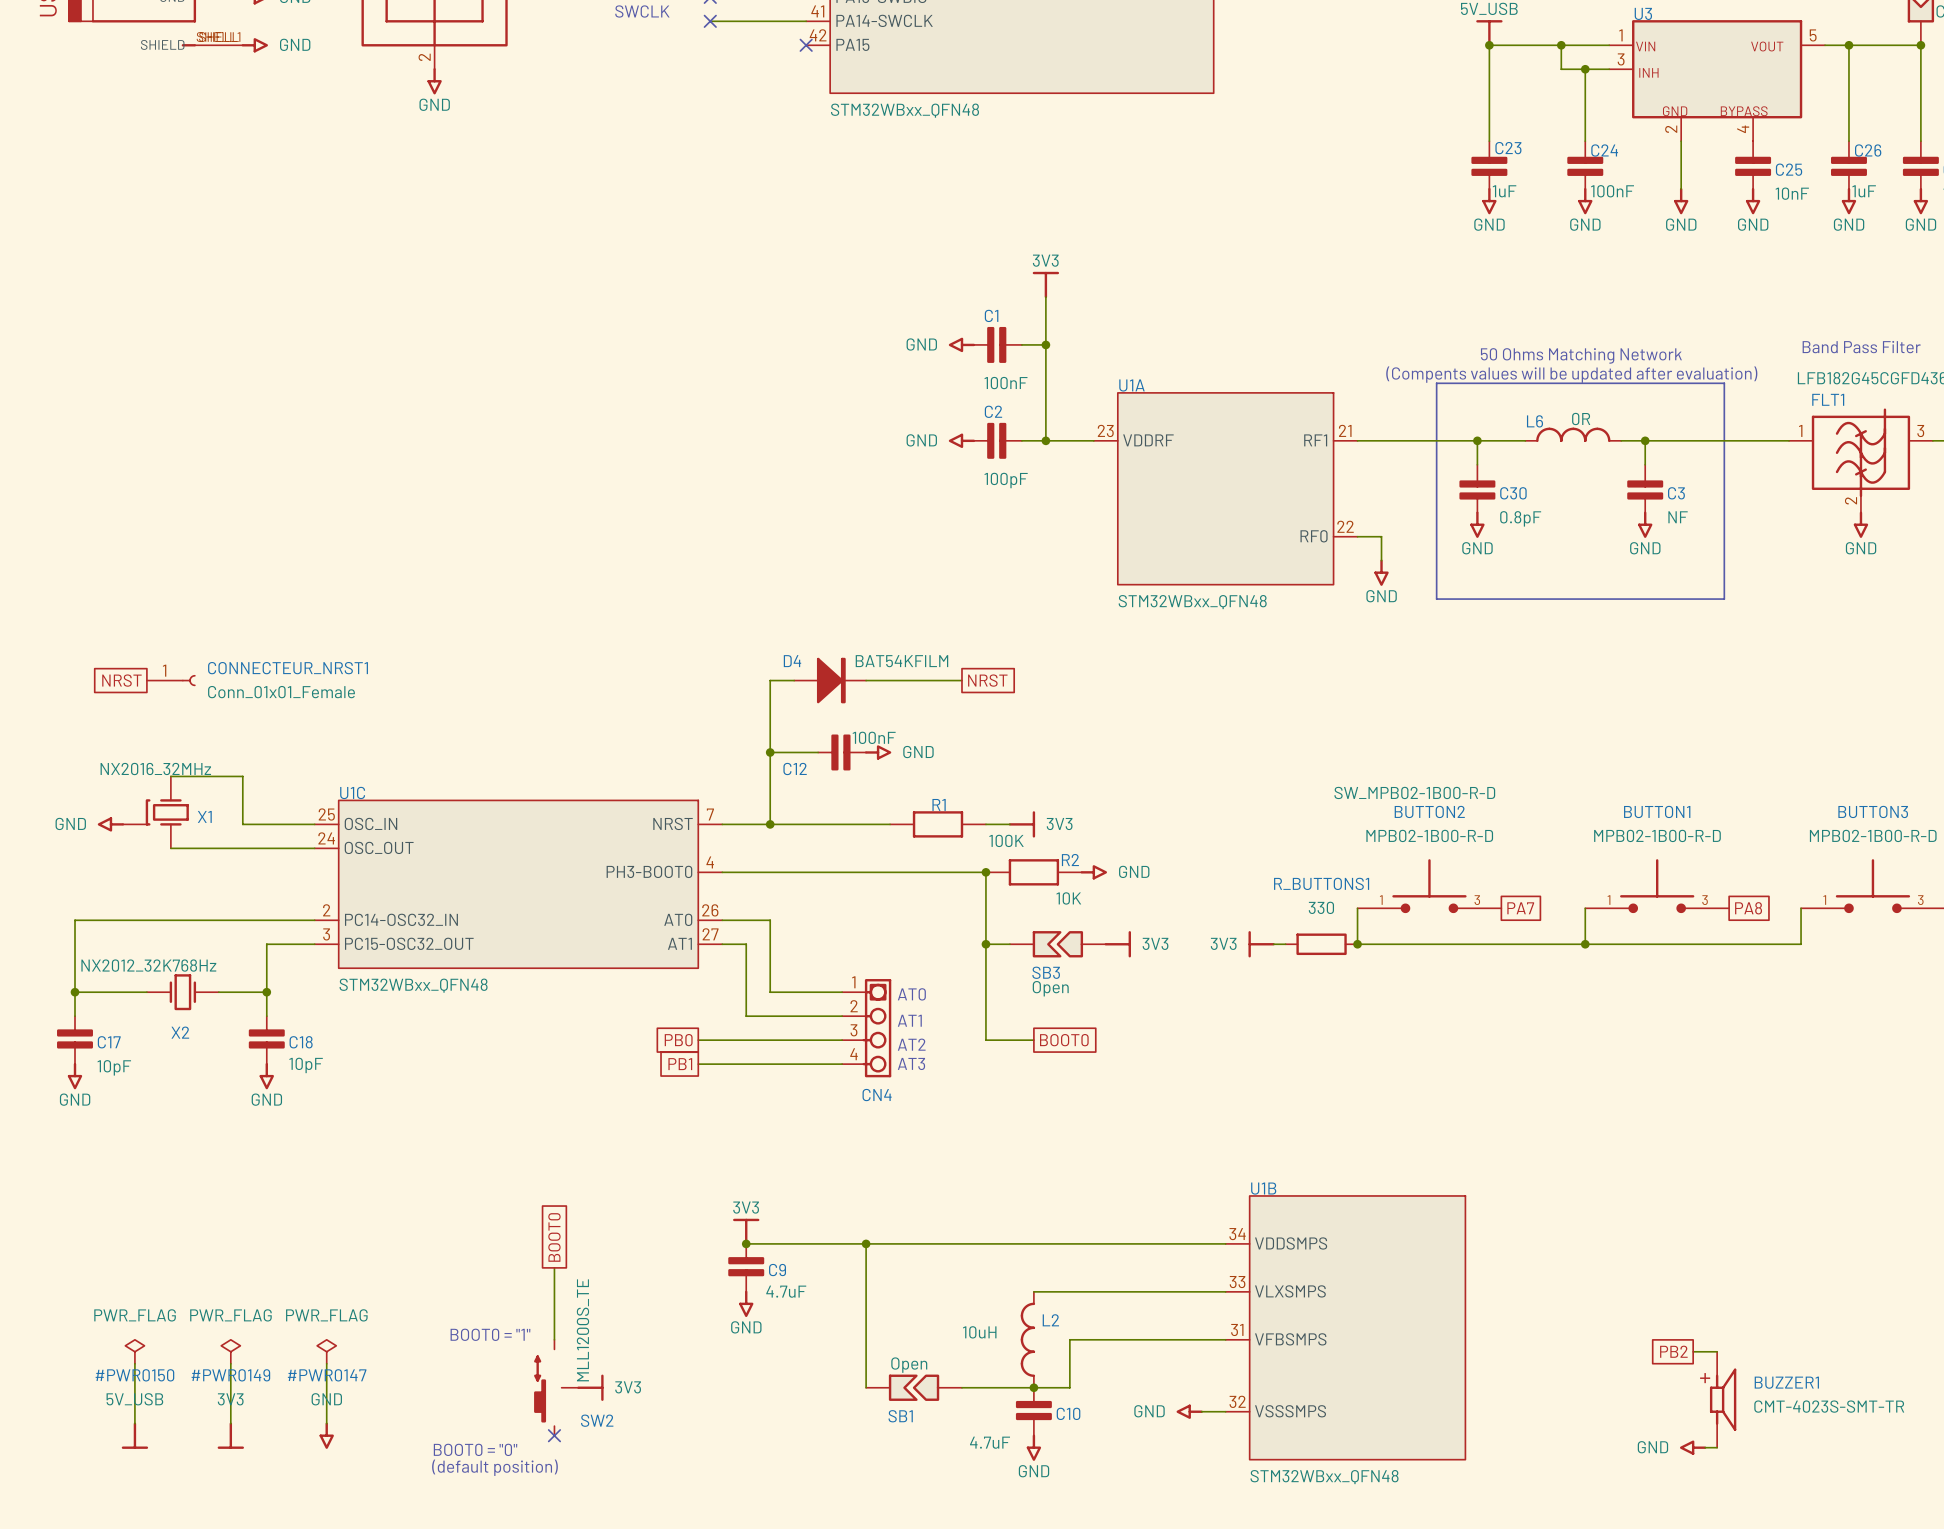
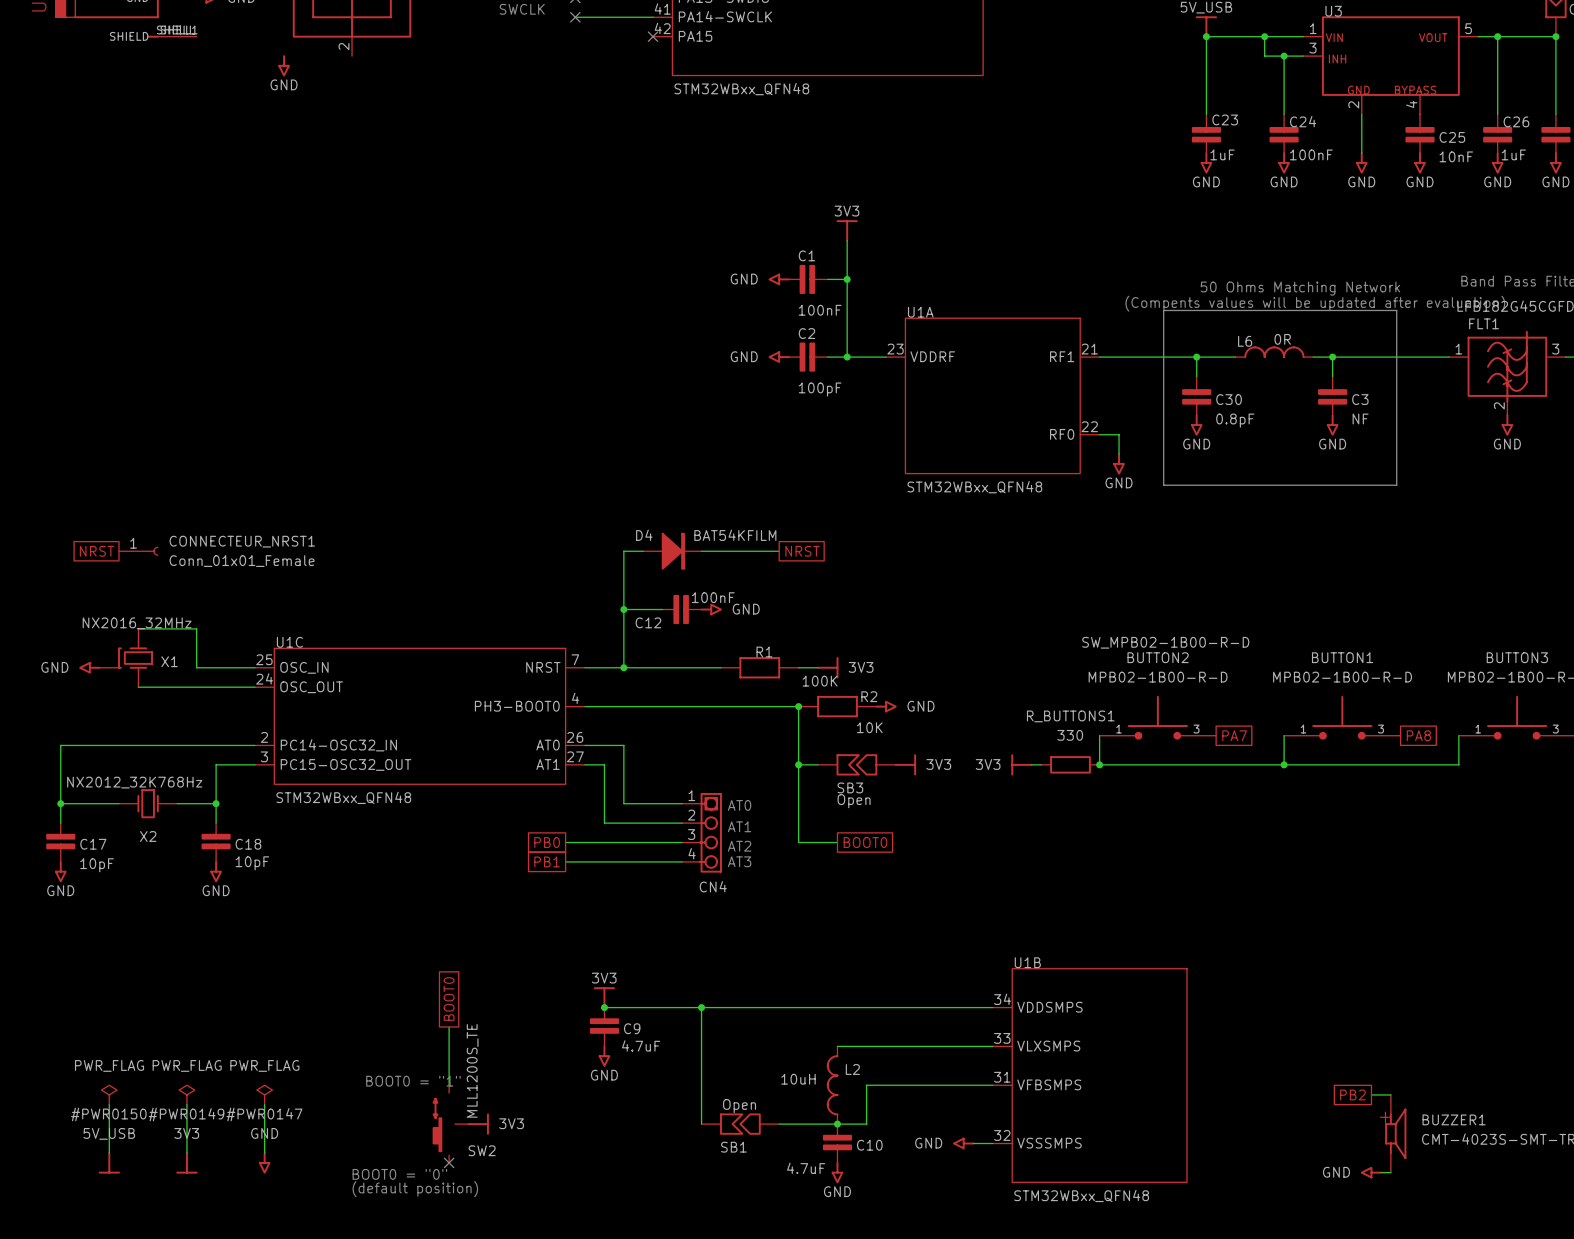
power symbol: GND (254, 45) -> none
power symbol: none -> GND (284, 65)
power symbol: GND (434, 81) -> none

